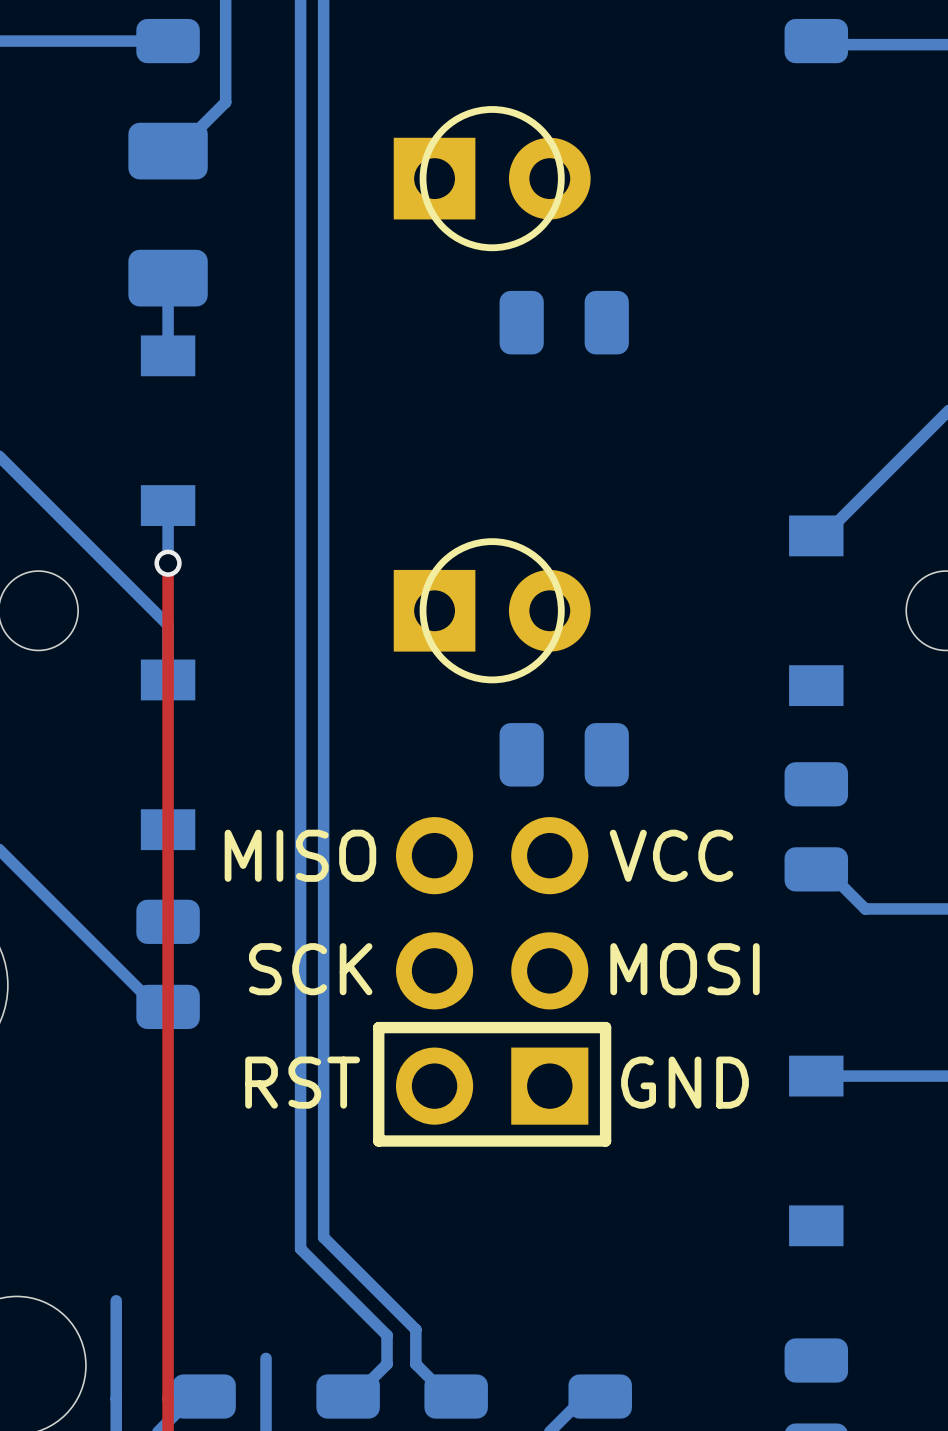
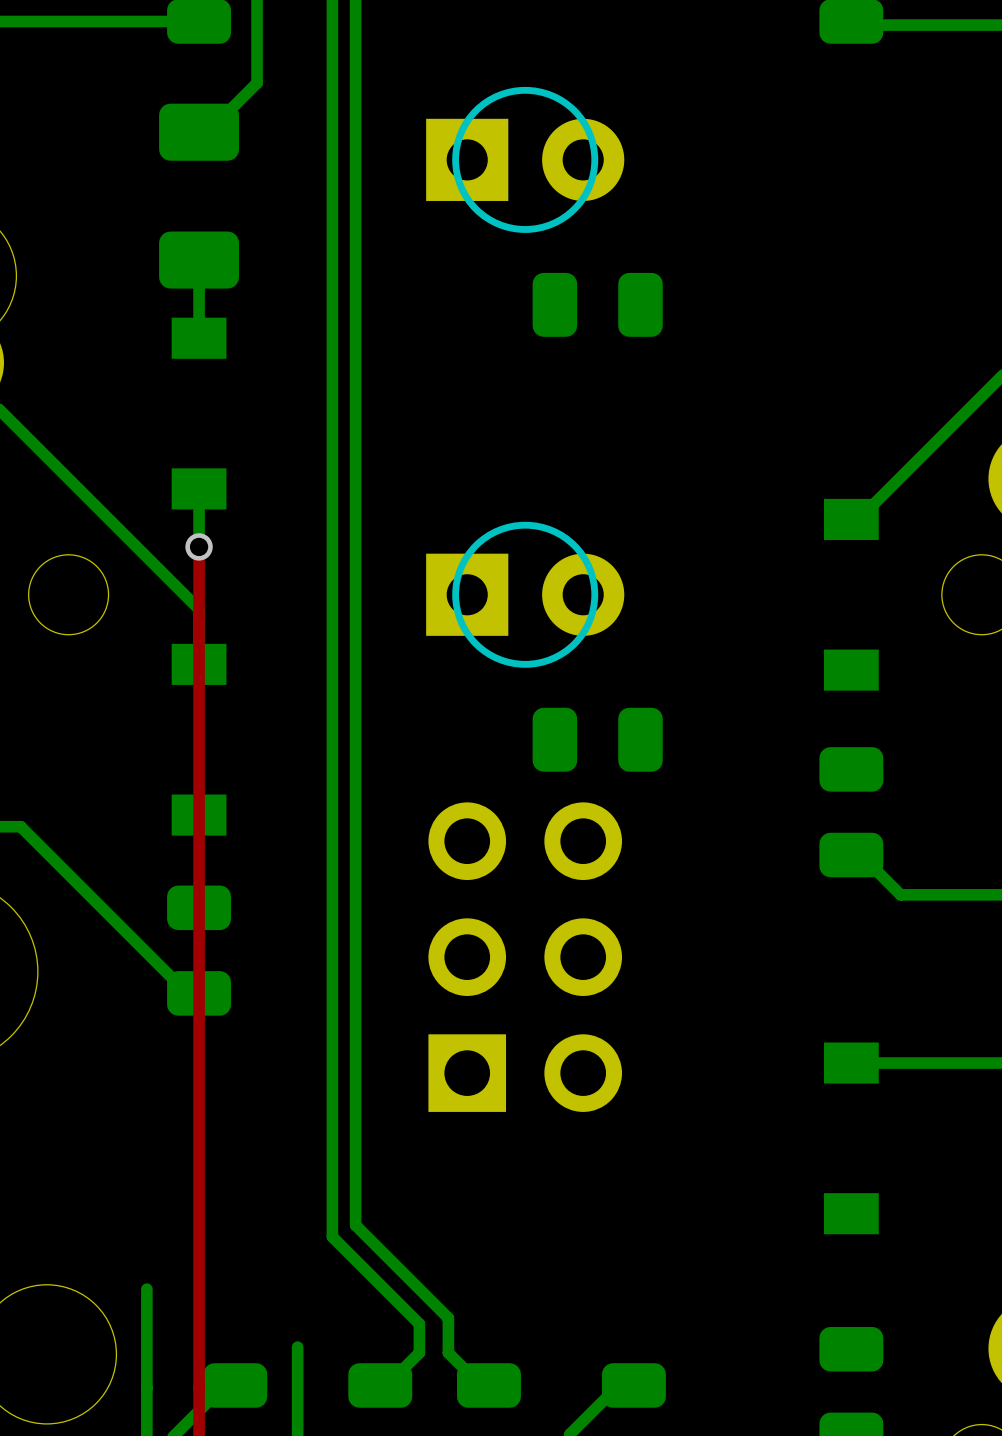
part side: top (492, 981) -> bottom (525, 957)

